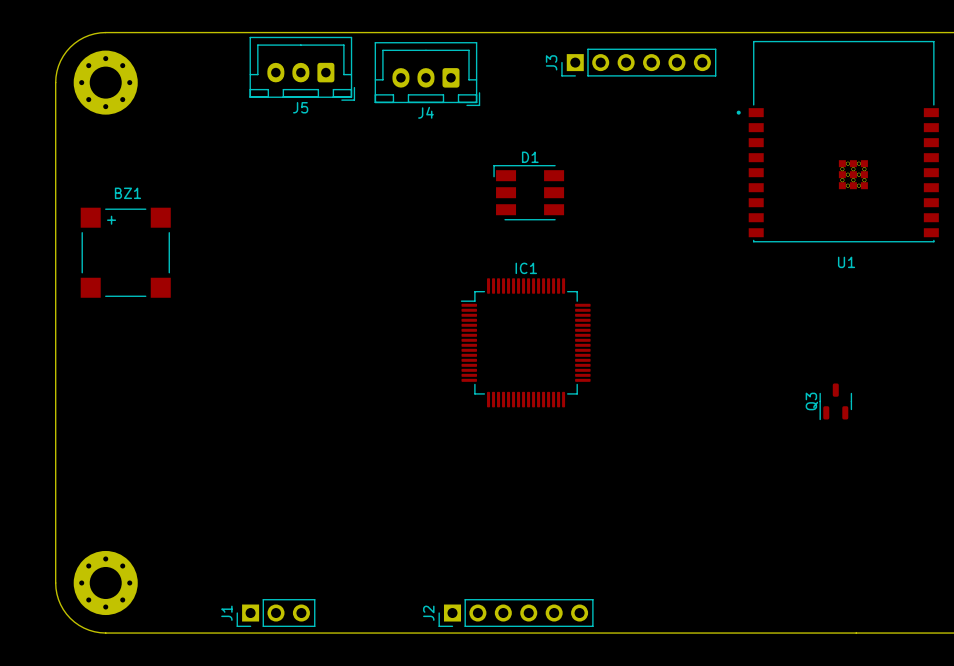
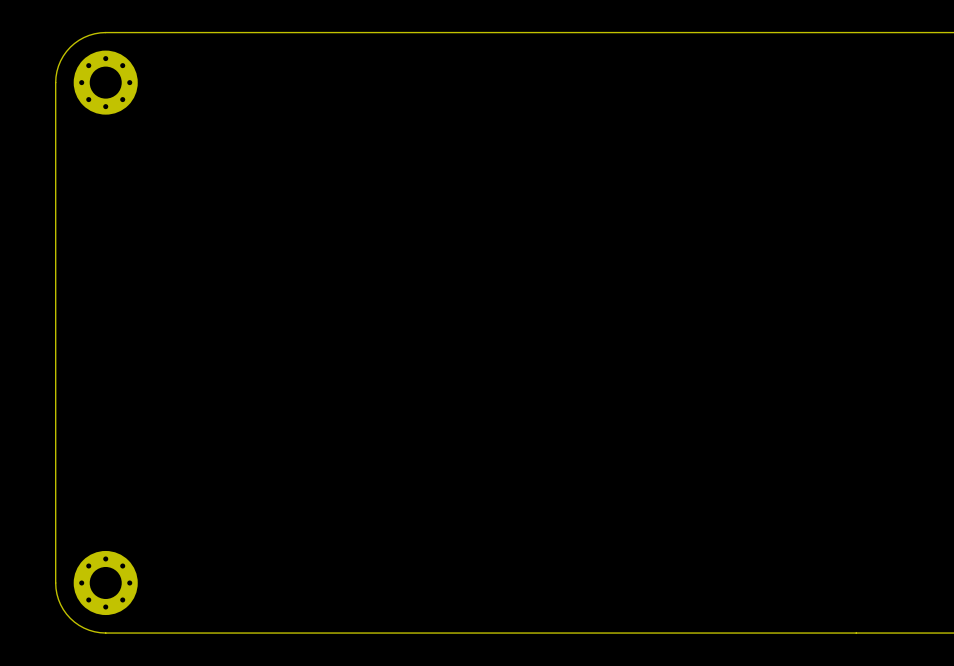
J3: (638, 62) -> none
J5: (302, 68) -> none
J4: (427, 74) -> none
U1: (837, 141) -> none
D1: (528, 192) -> none
BZ1: (125, 252) -> none
IC1: (525, 342) -> none
Q3: (835, 401) -> none
J1: (276, 613) -> none
J2: (516, 613) -> none

